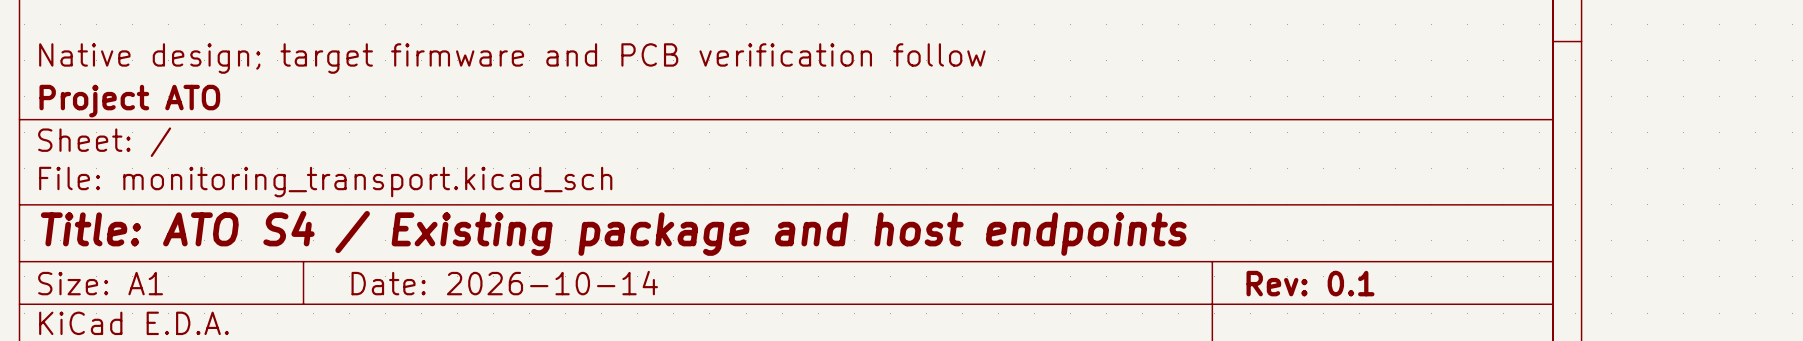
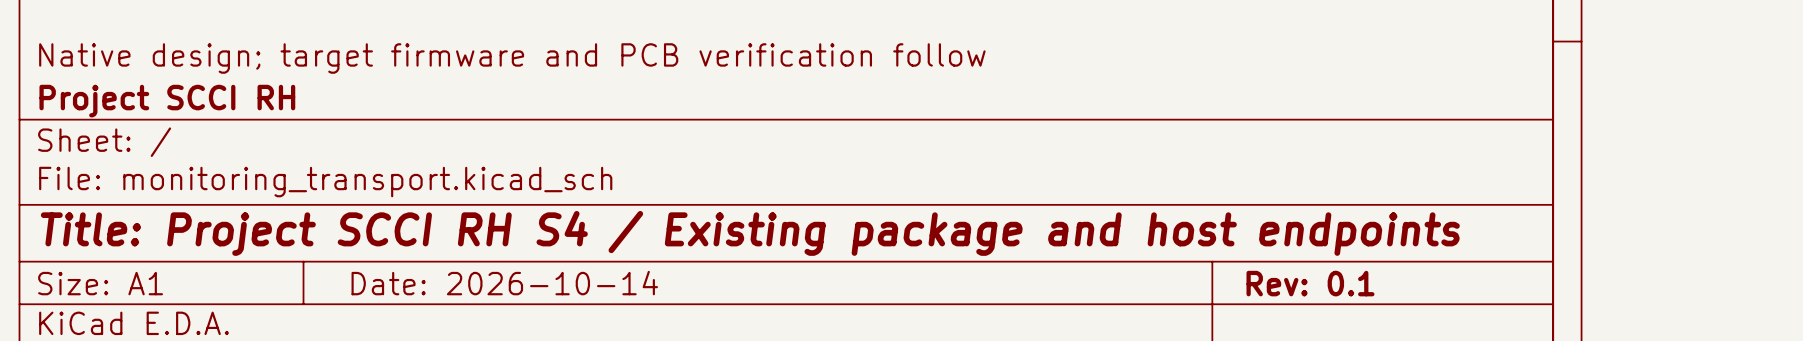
title block: Project ATO (129, 101) -> Project SCCI RH (167, 101)
title block: Title: ATO S4 / Existing package and host endpoints (613, 233) -> Title: Project SCCI RH S4 / Existing package and host endpoints (750, 233)

